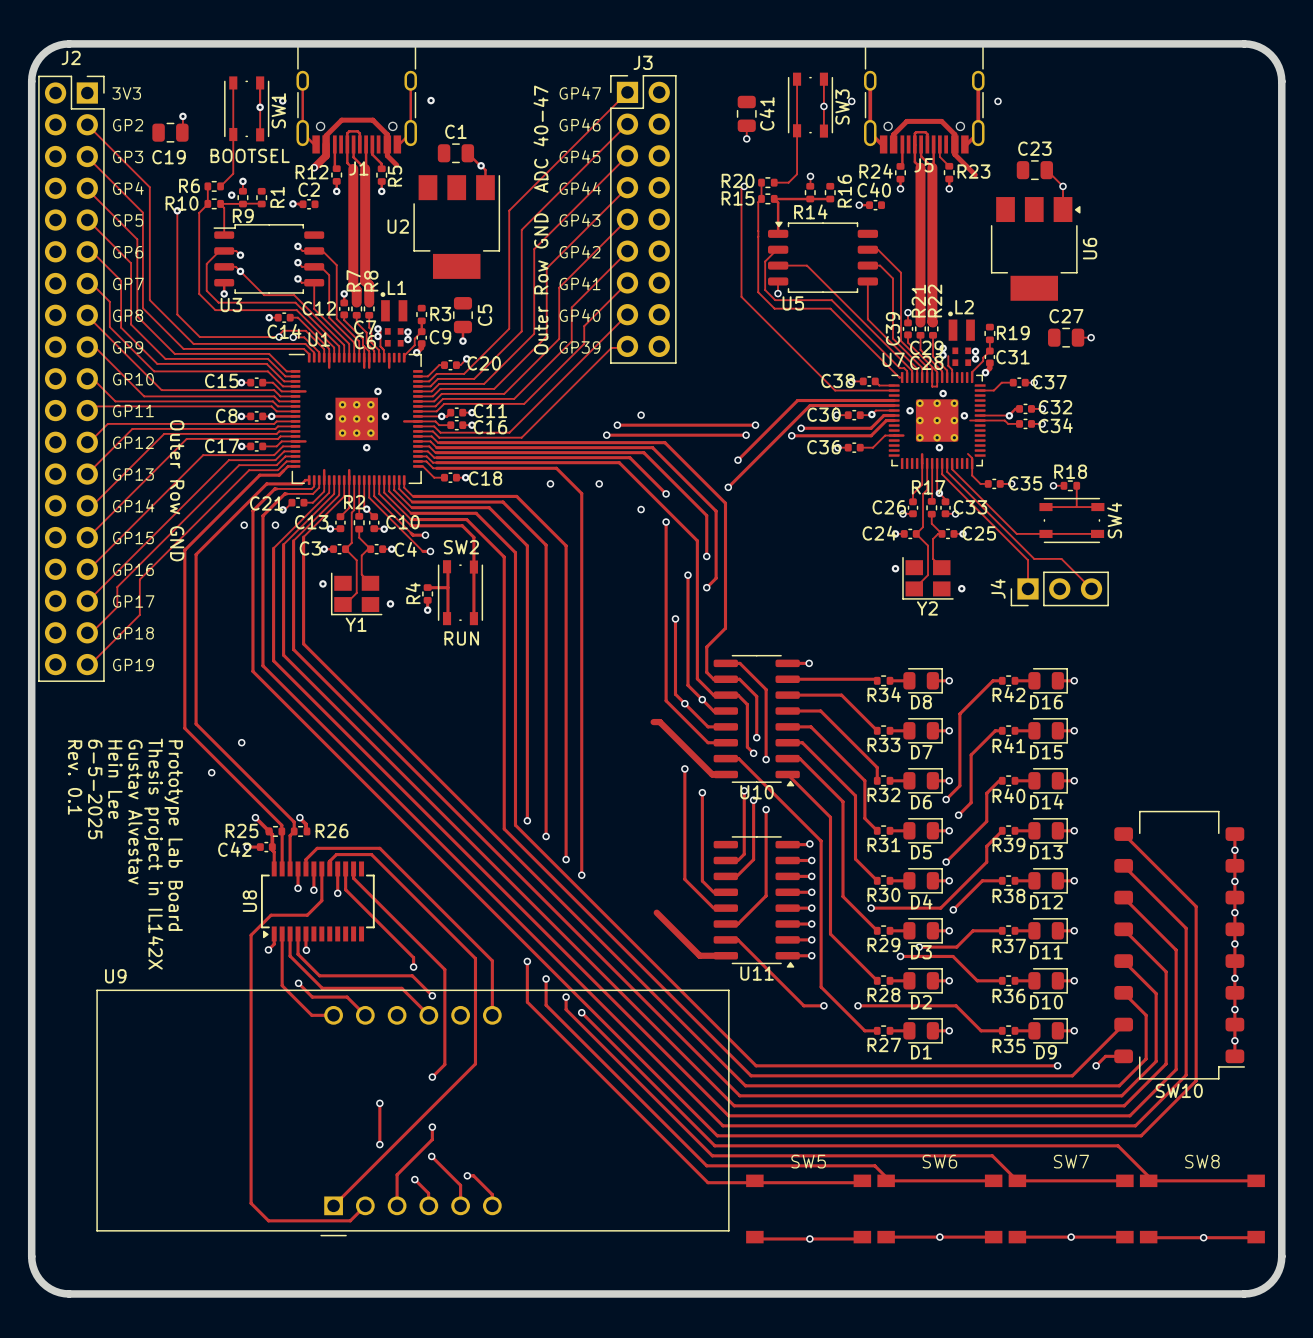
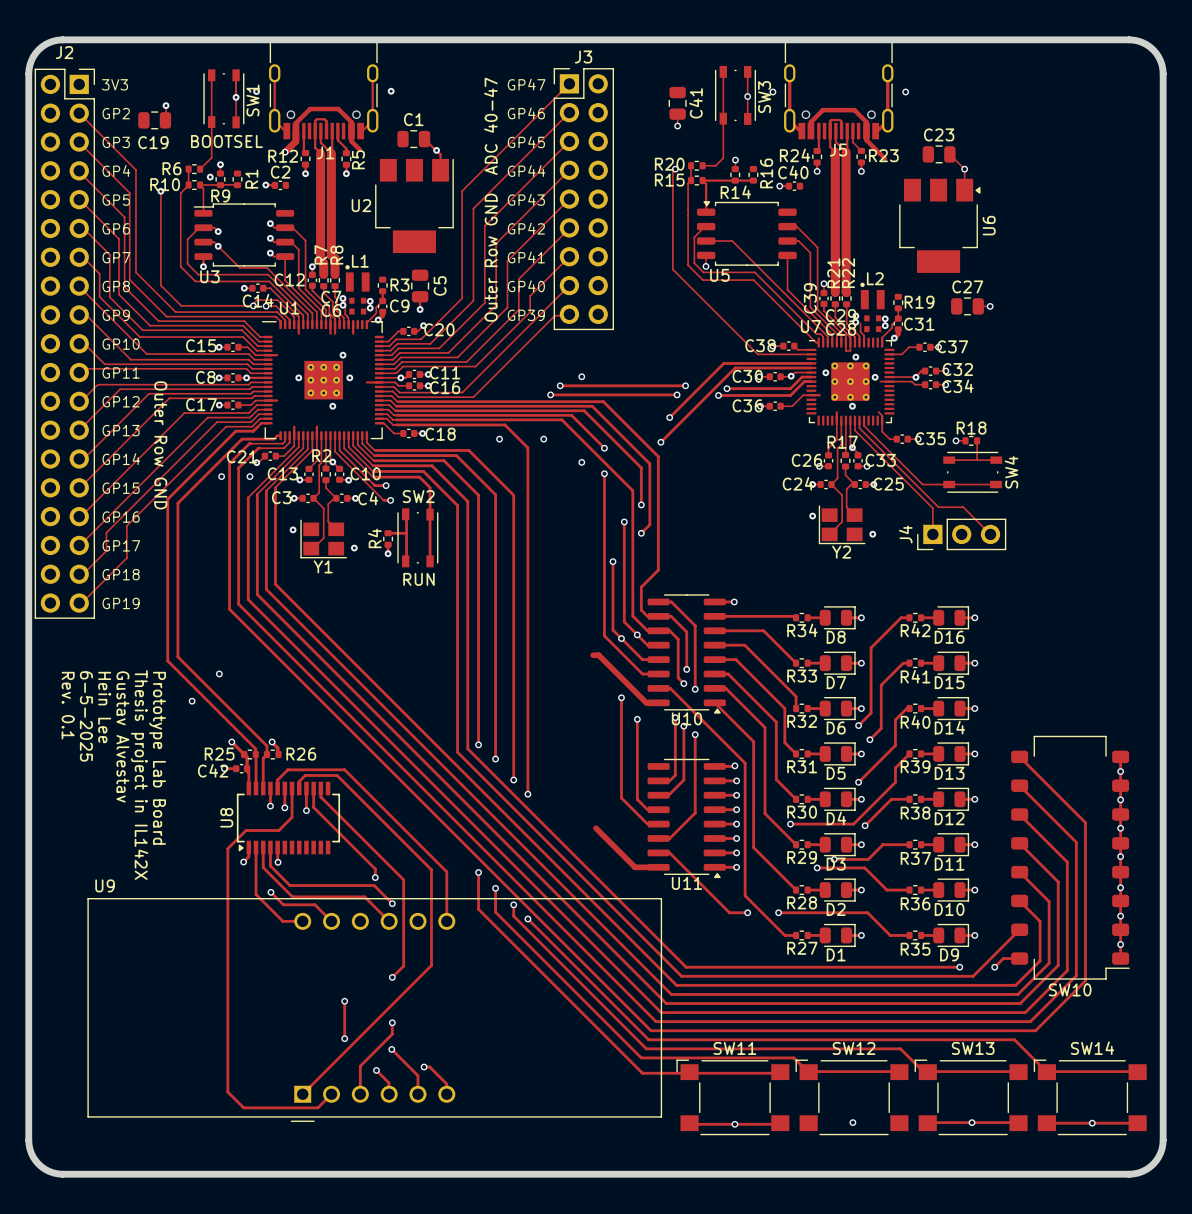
SW5: (808, 1208) -> none
SW6: (939, 1208) -> none
SW7: (1071, 1208) -> none
SW8: (1202, 1208) -> none
SW11: none -> (732, 1097)
SW12: none -> (852, 1097)
SW13: none -> (971, 1097)
SW14: none -> (1090, 1097)
track: (892, 1237) (999, 1237) -> none

